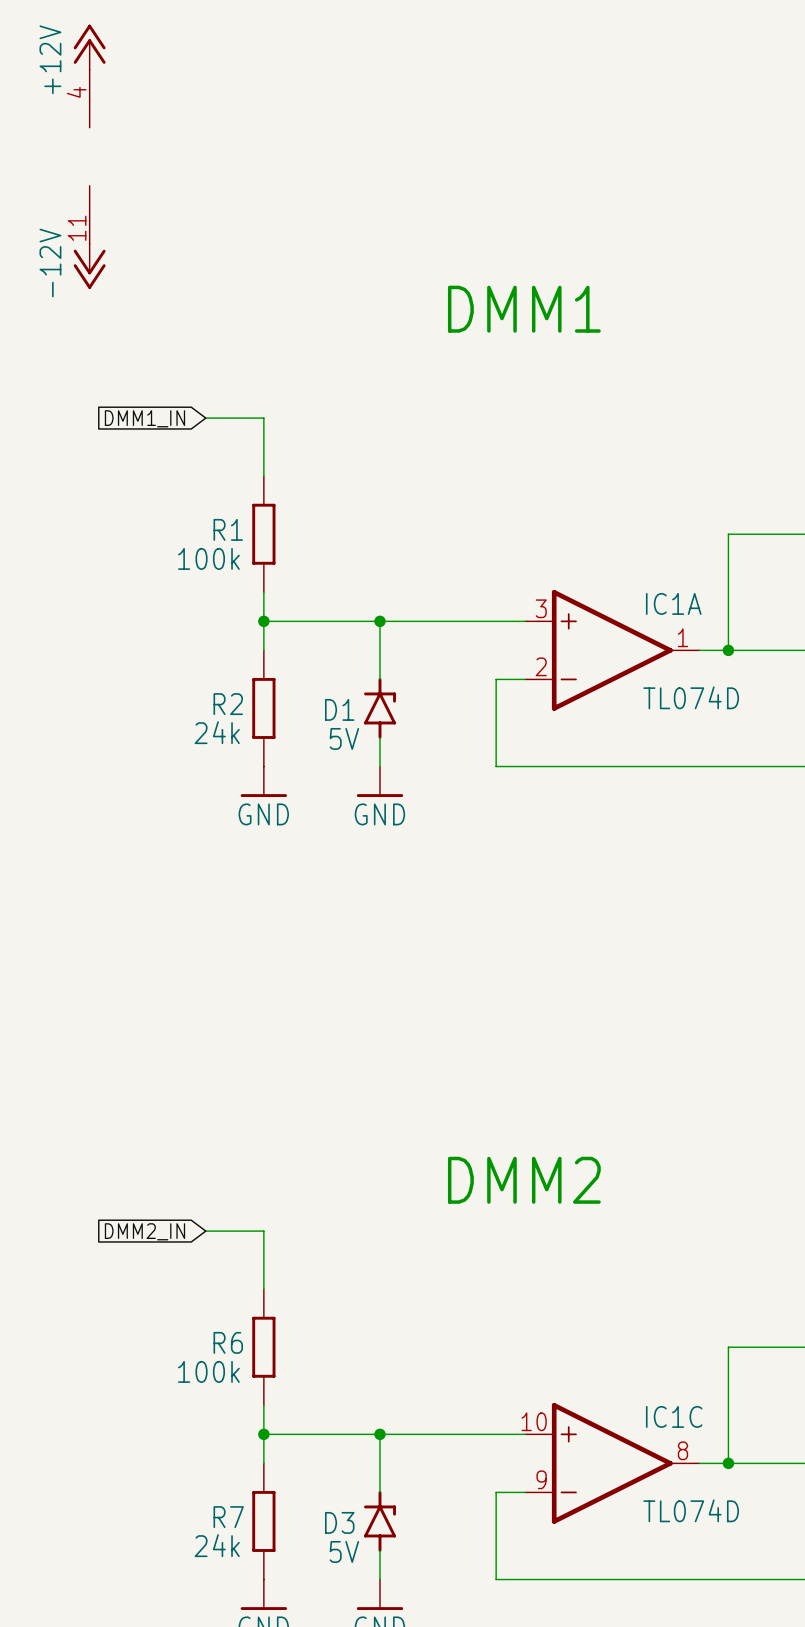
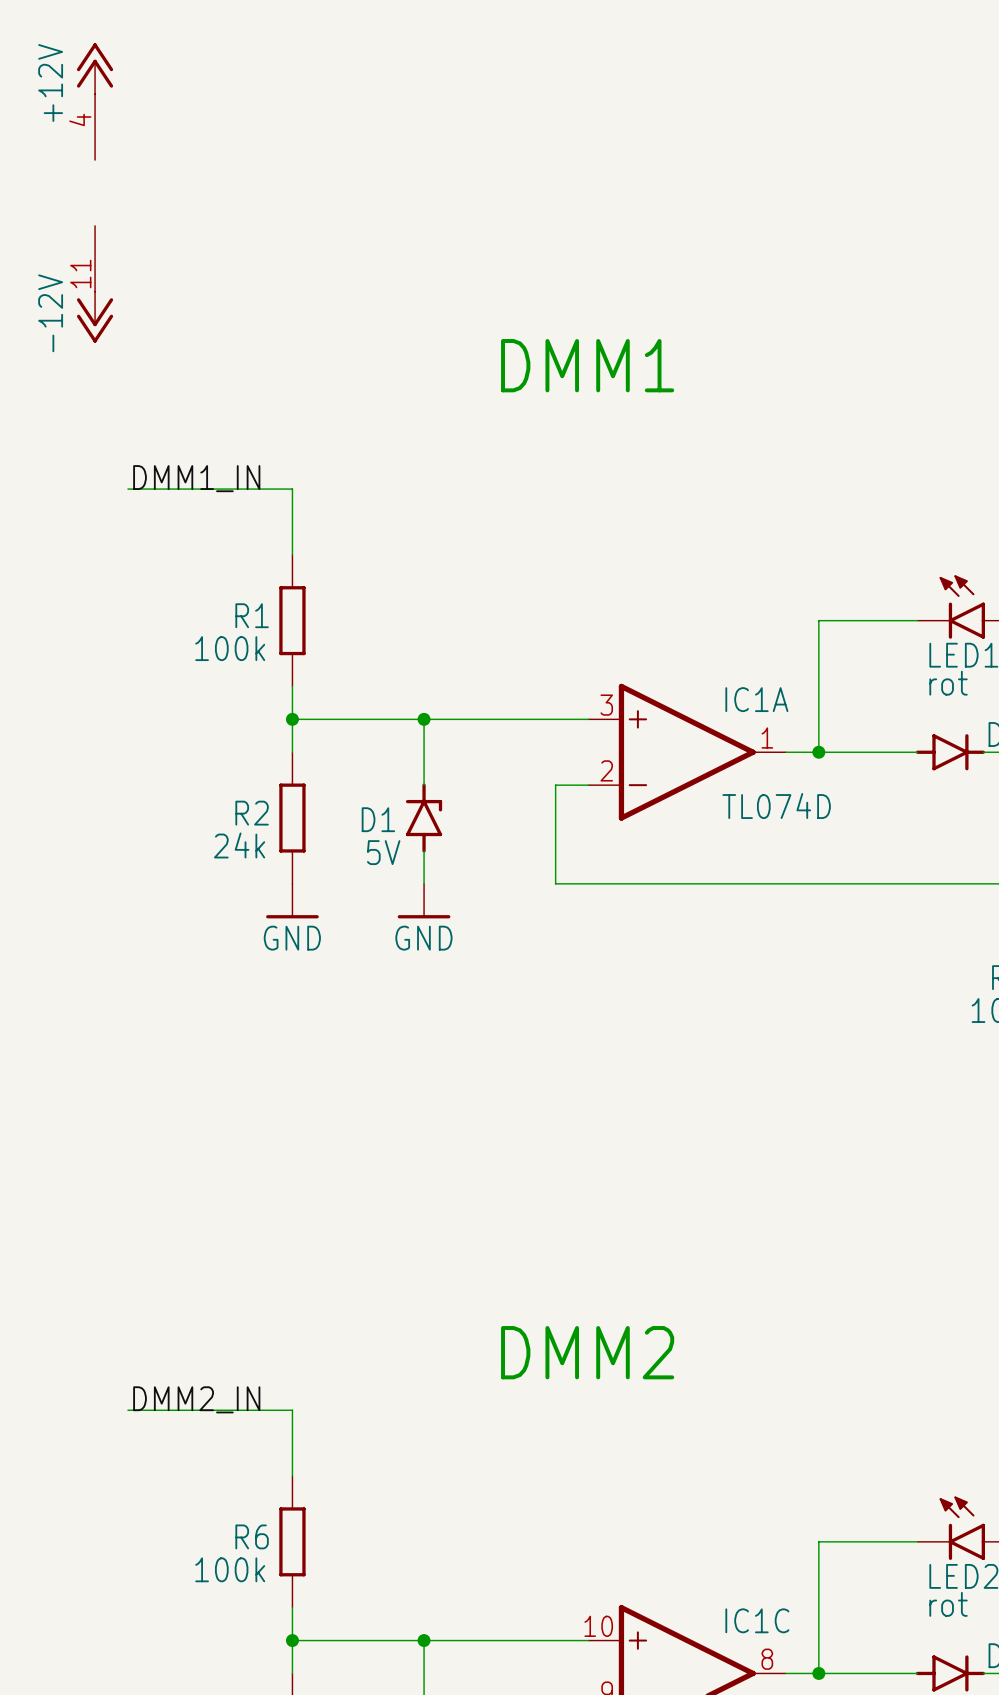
label: none -> DMM1_IN (196, 478)
wire: none -> (127, 489) (226, 489)
global label: DMM1_IN (144, 418) -> none
label: none -> DMM2_IN (196, 1399)
wire: none -> (127, 1410) (226, 1410)
global label: DMM2_IN (144, 1231) -> none

